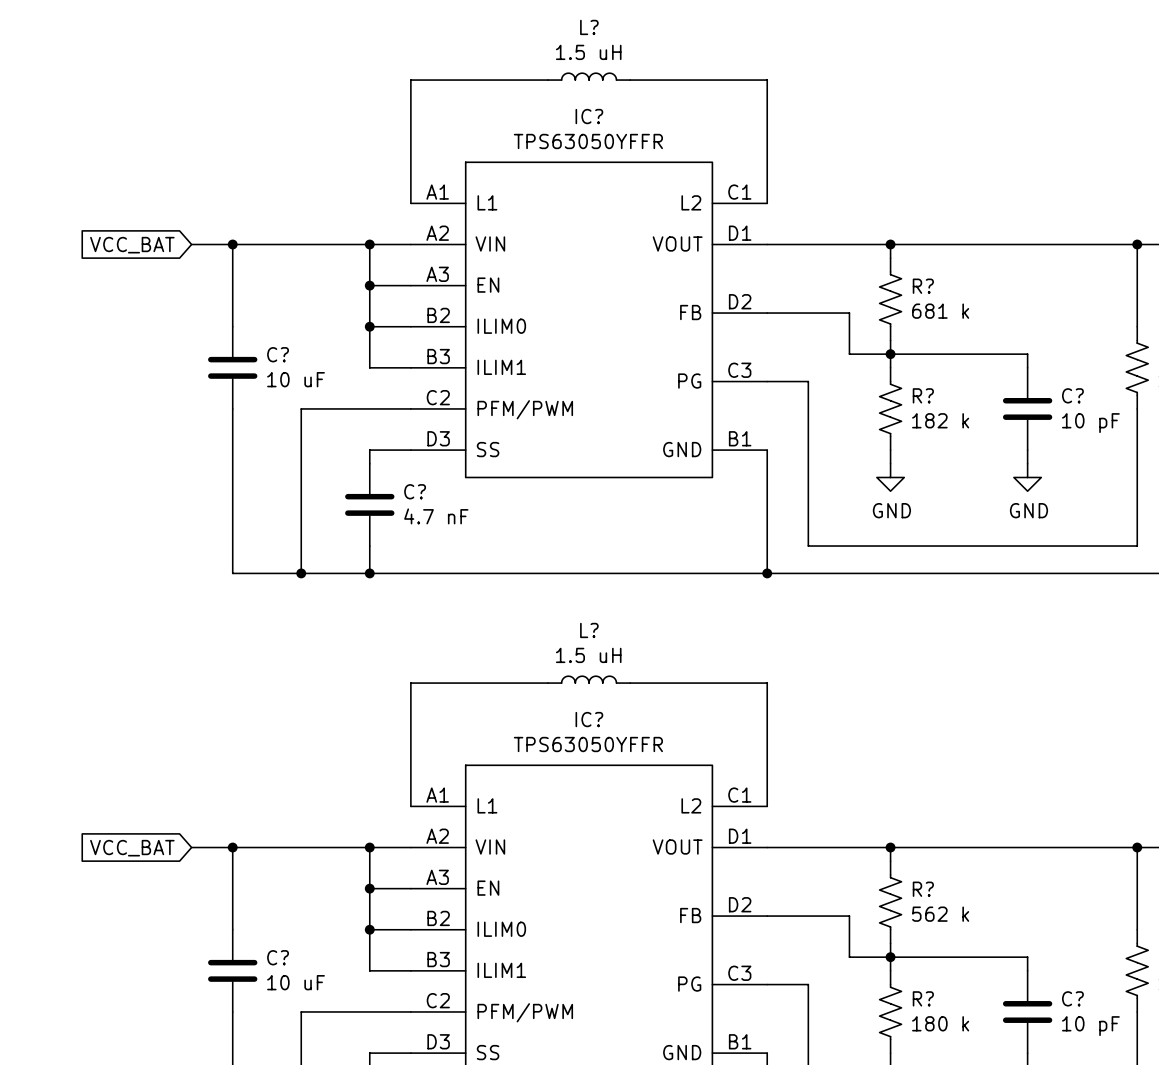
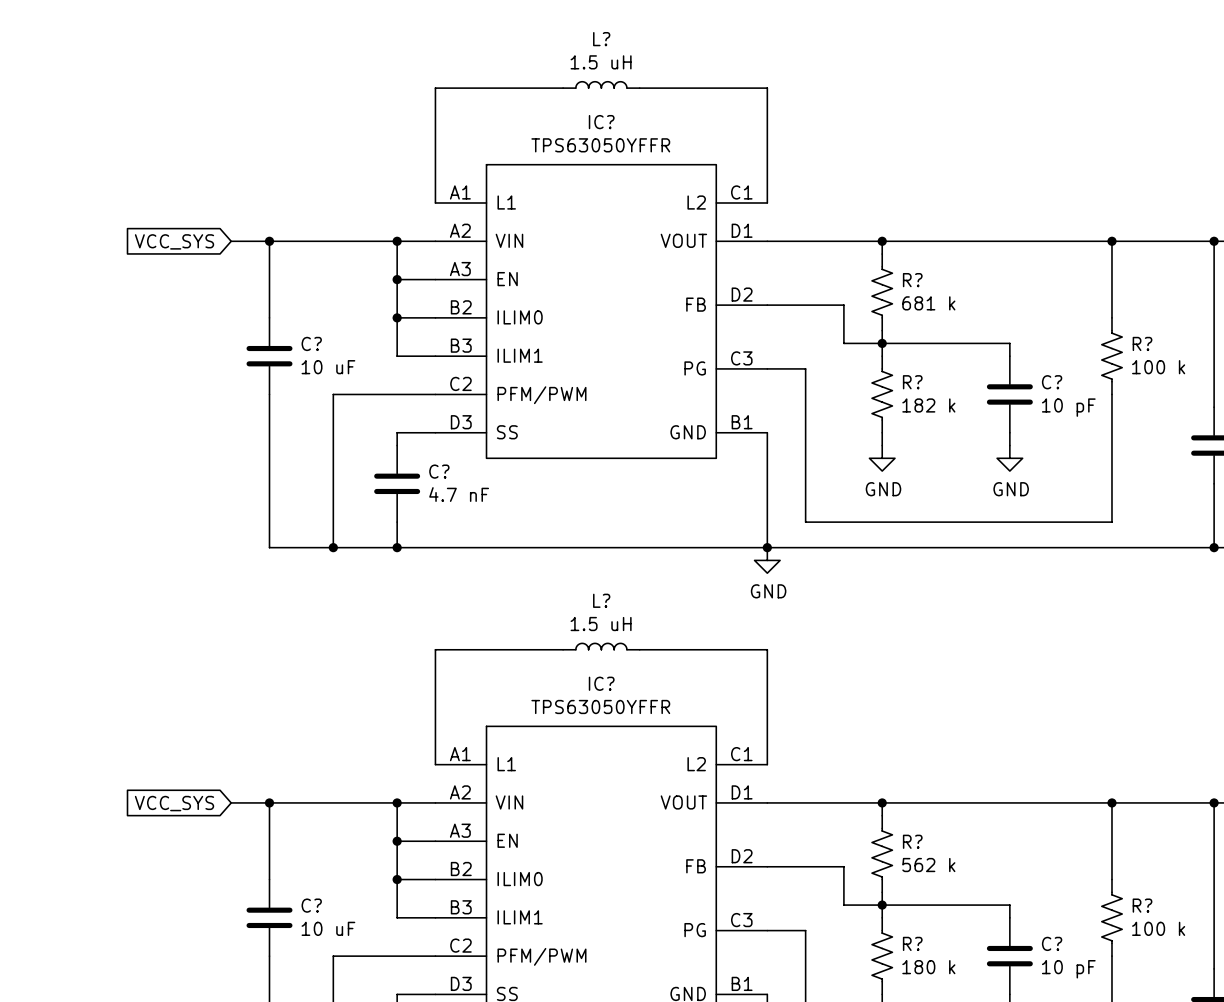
global label: VCC_BAT (132, 245) -> VCC_SYS (174, 241)
power symbol: none -> GND (767, 560)
global label: VCC_BAT (132, 848) -> VCC_SYS (174, 803)

